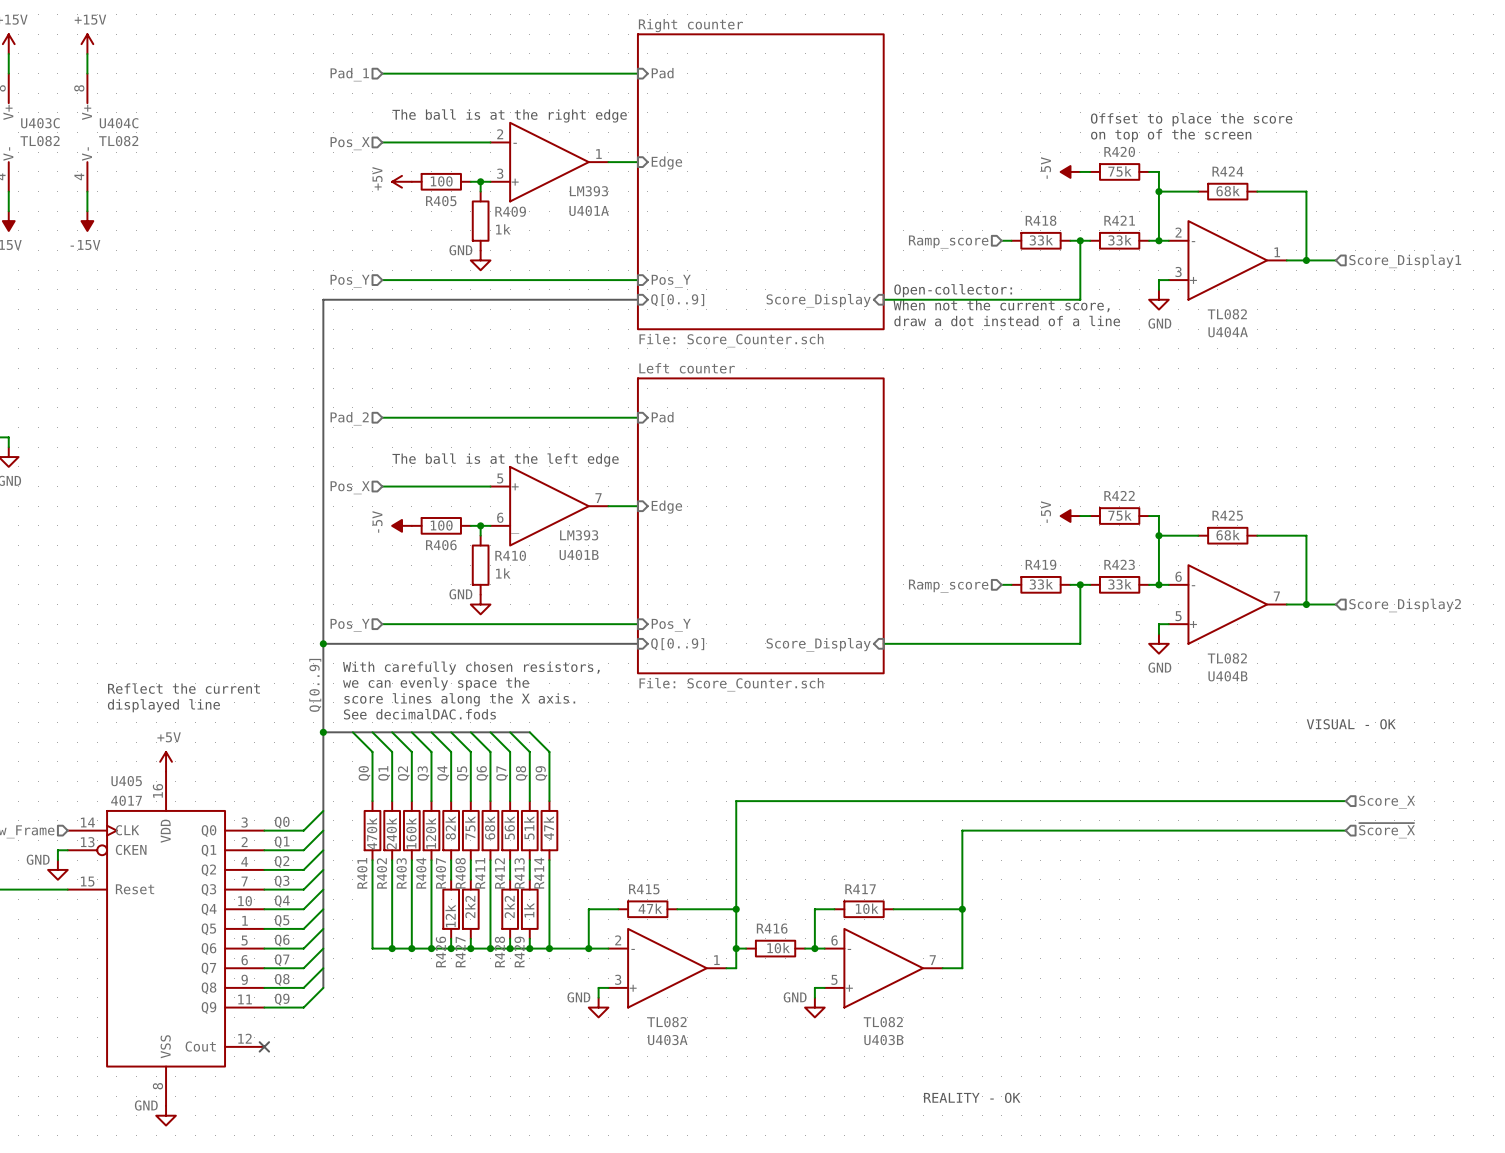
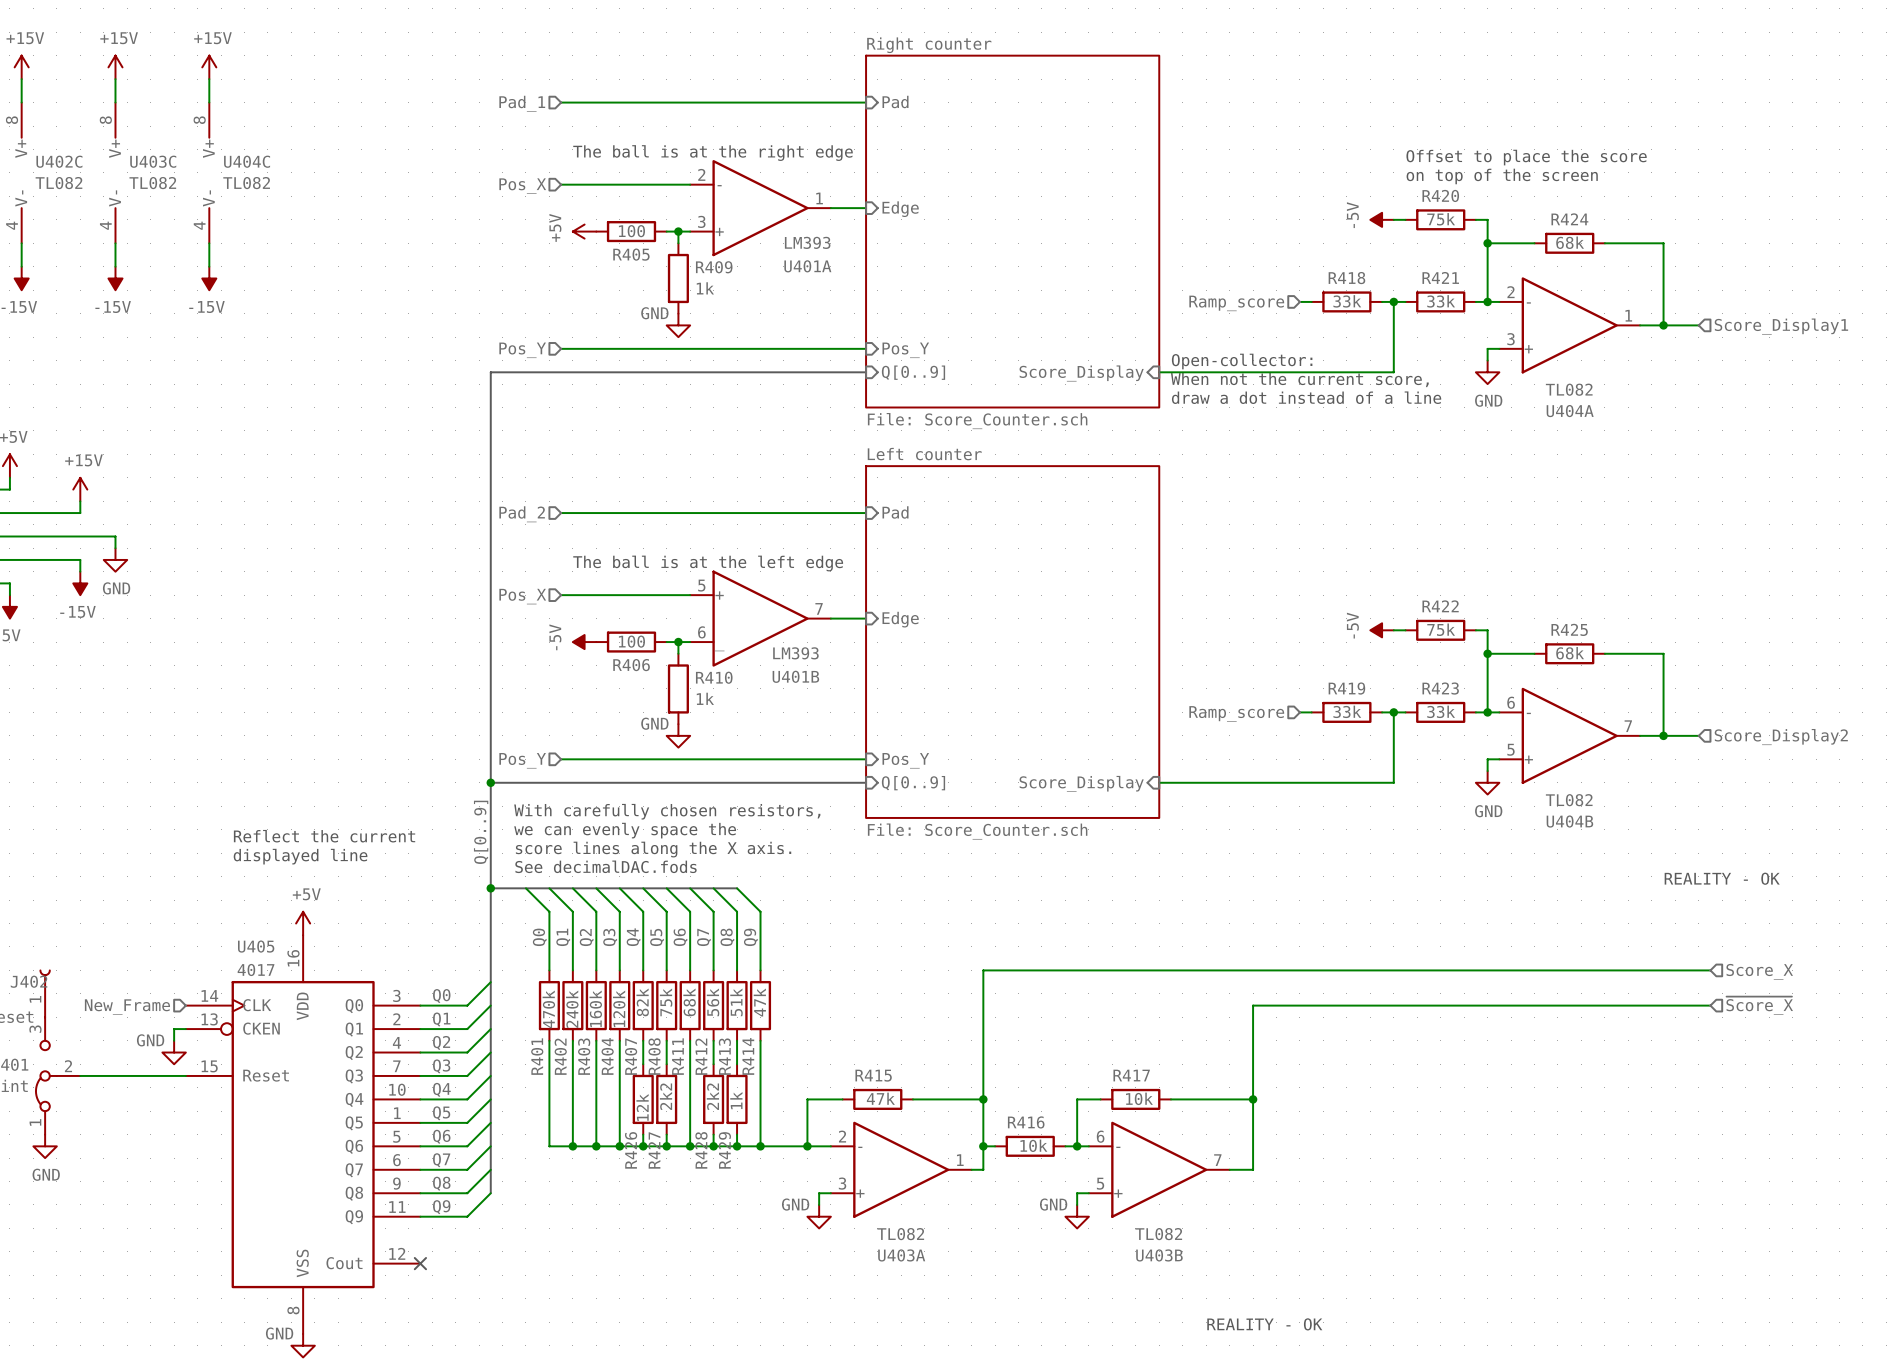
text: VISUAL - OK (1351, 724) -> REALITY - OK (1722, 878)

